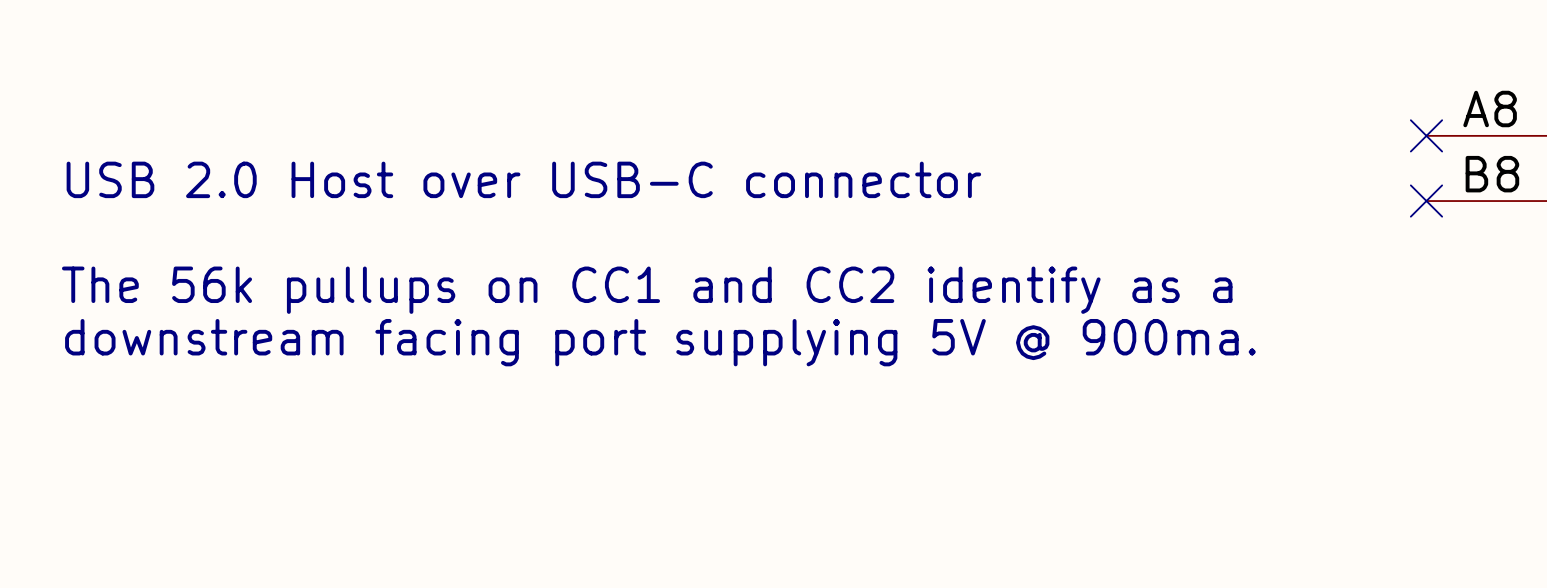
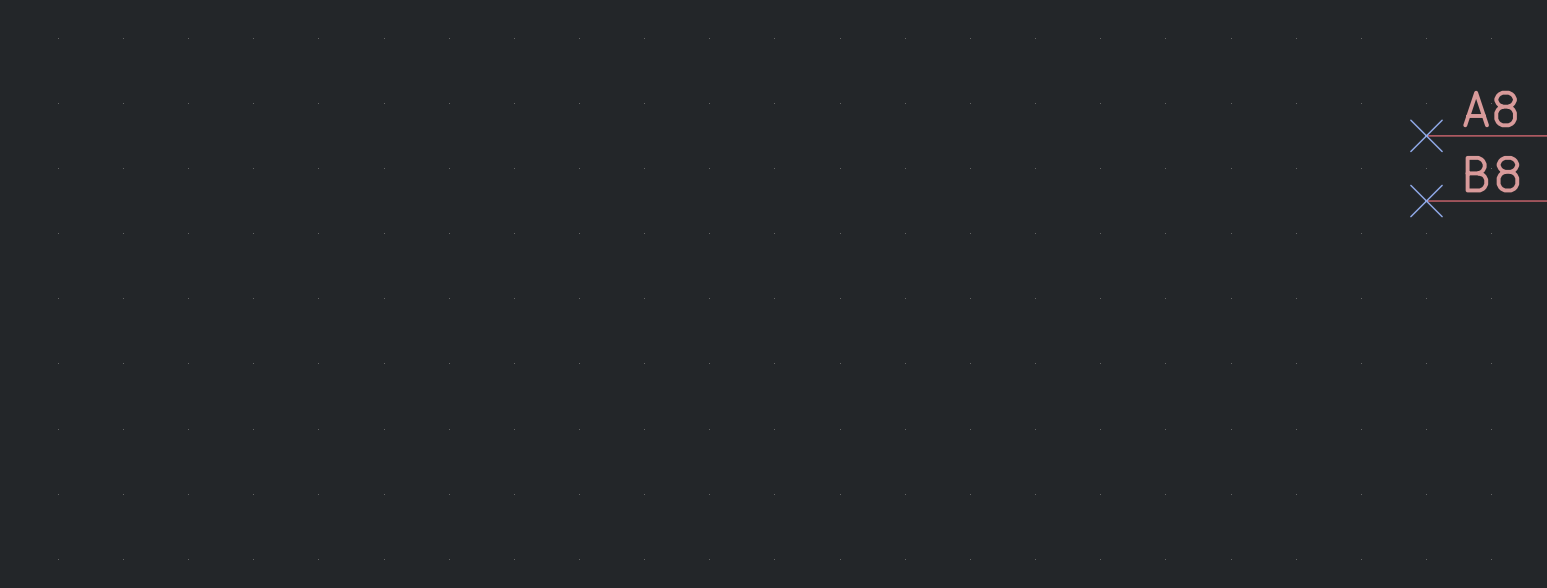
text: USB 2.0 Host over USB-C connector (523, 179) -> none
text: The 56k pullups on CC1 and CC2 identify as a (647, 290) -> none
text: downstream facing port supplying 5V @ 900ma. (660, 342) -> none

